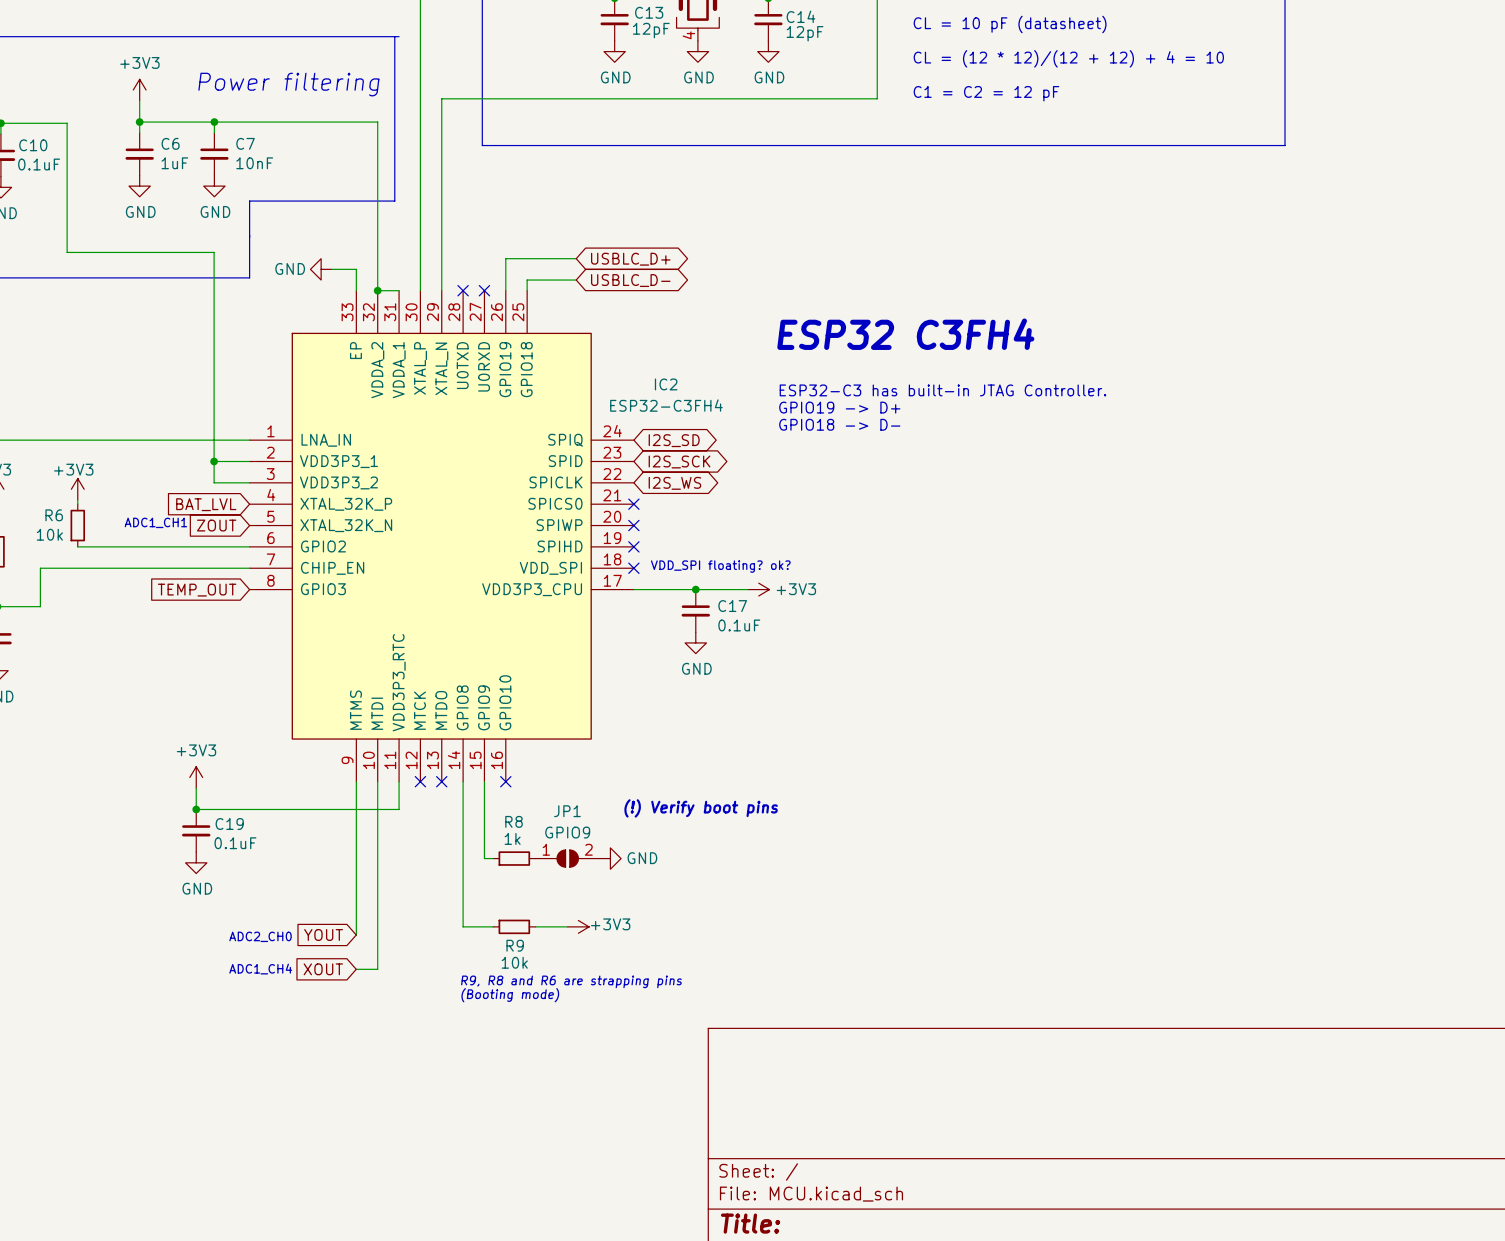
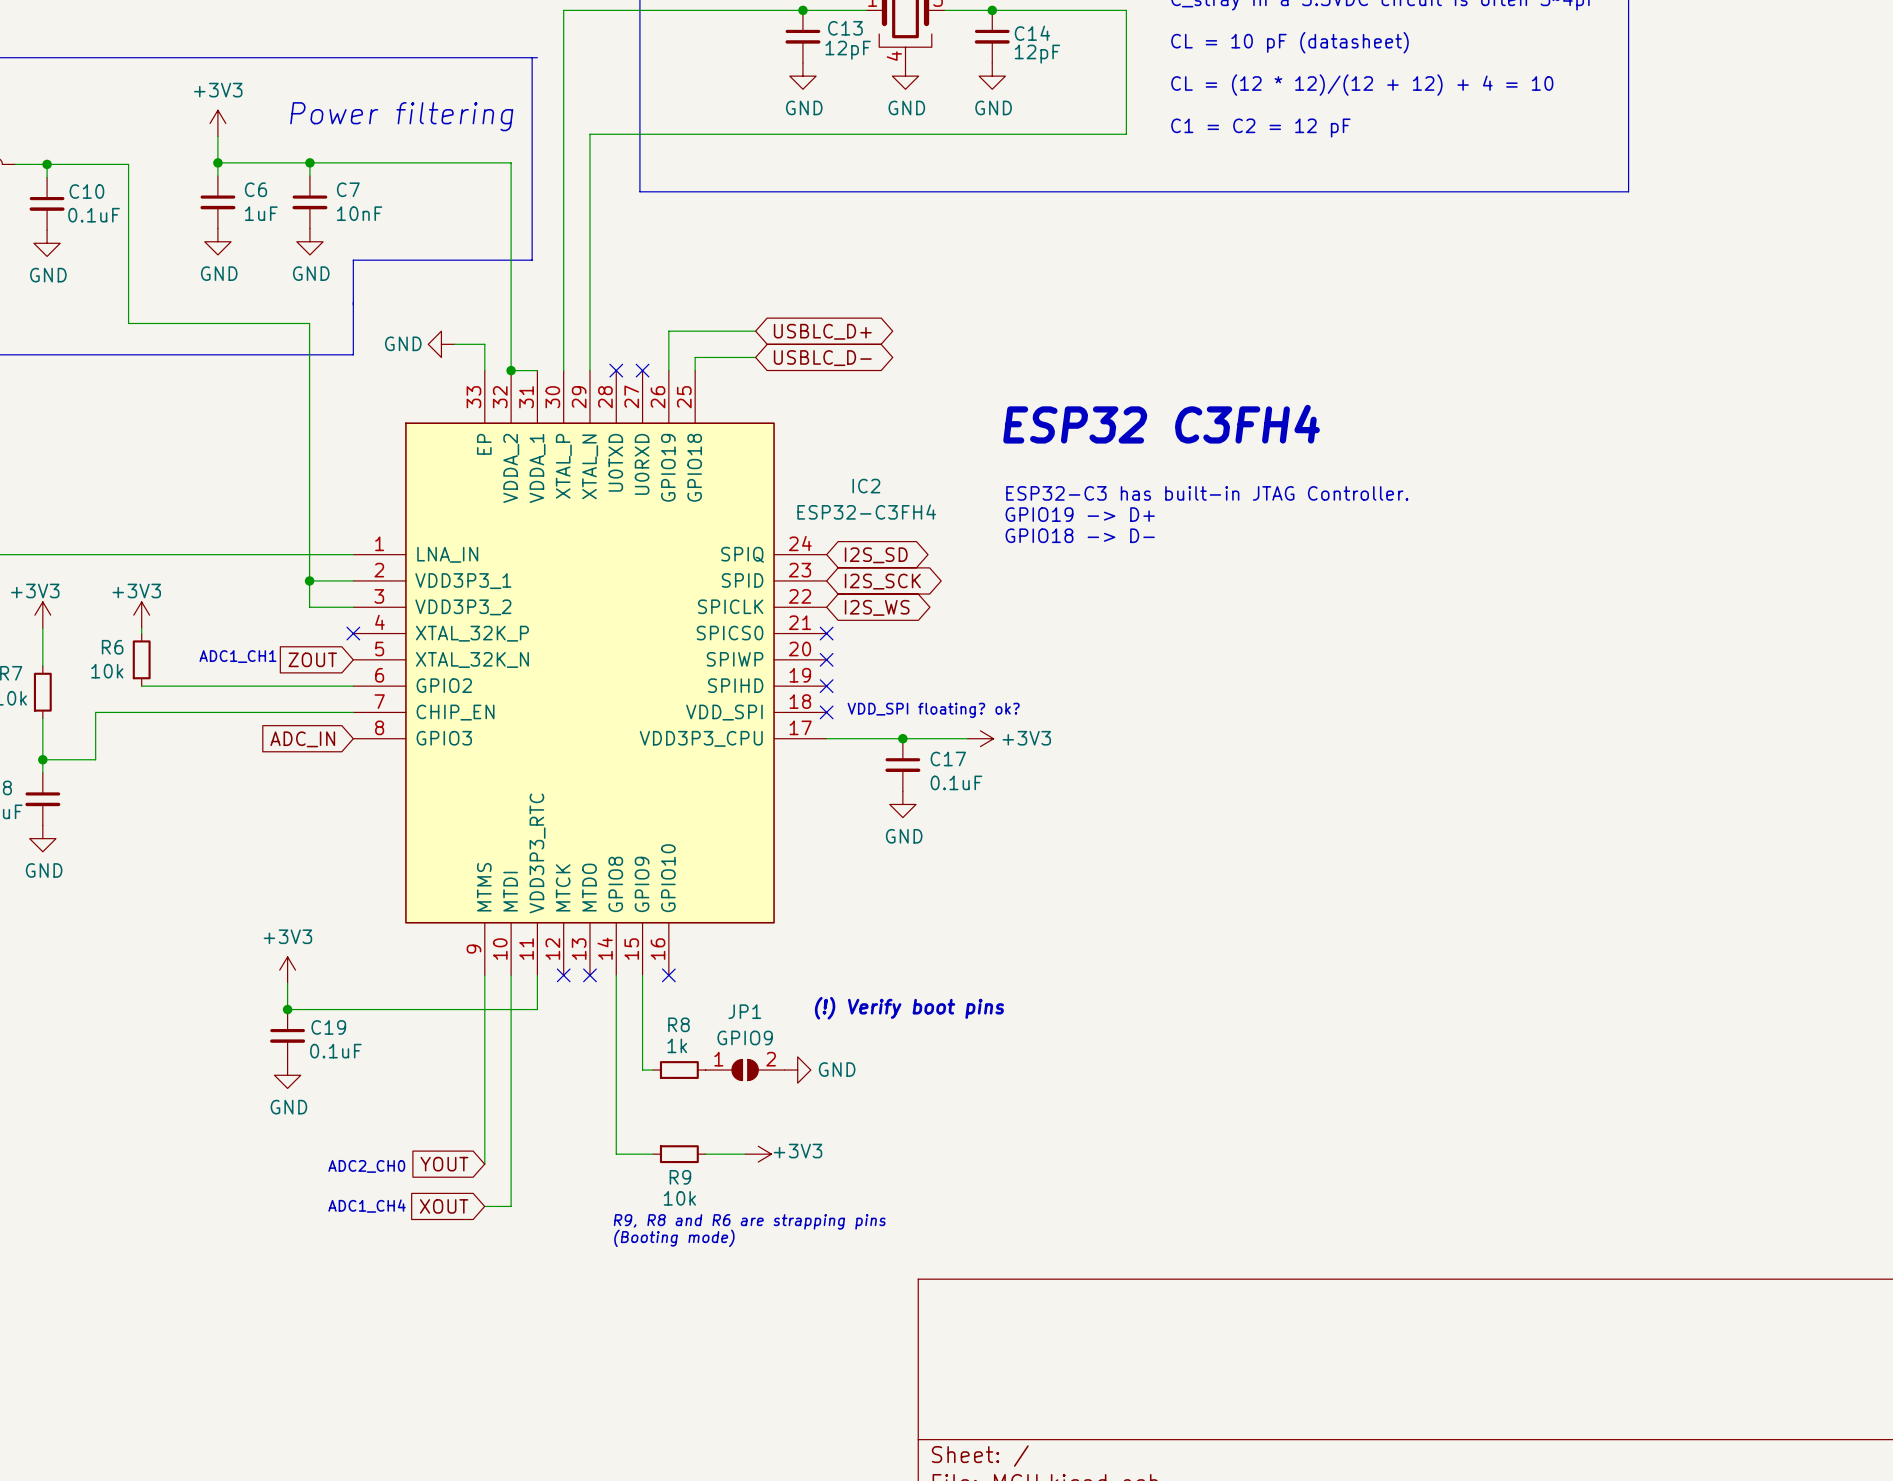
global label: BAT_LVL (206, 504) -> none
no-connect mark: none -> (353, 633)
global label: TEMP_OUT (197, 590) -> ADC_IN (302, 739)

